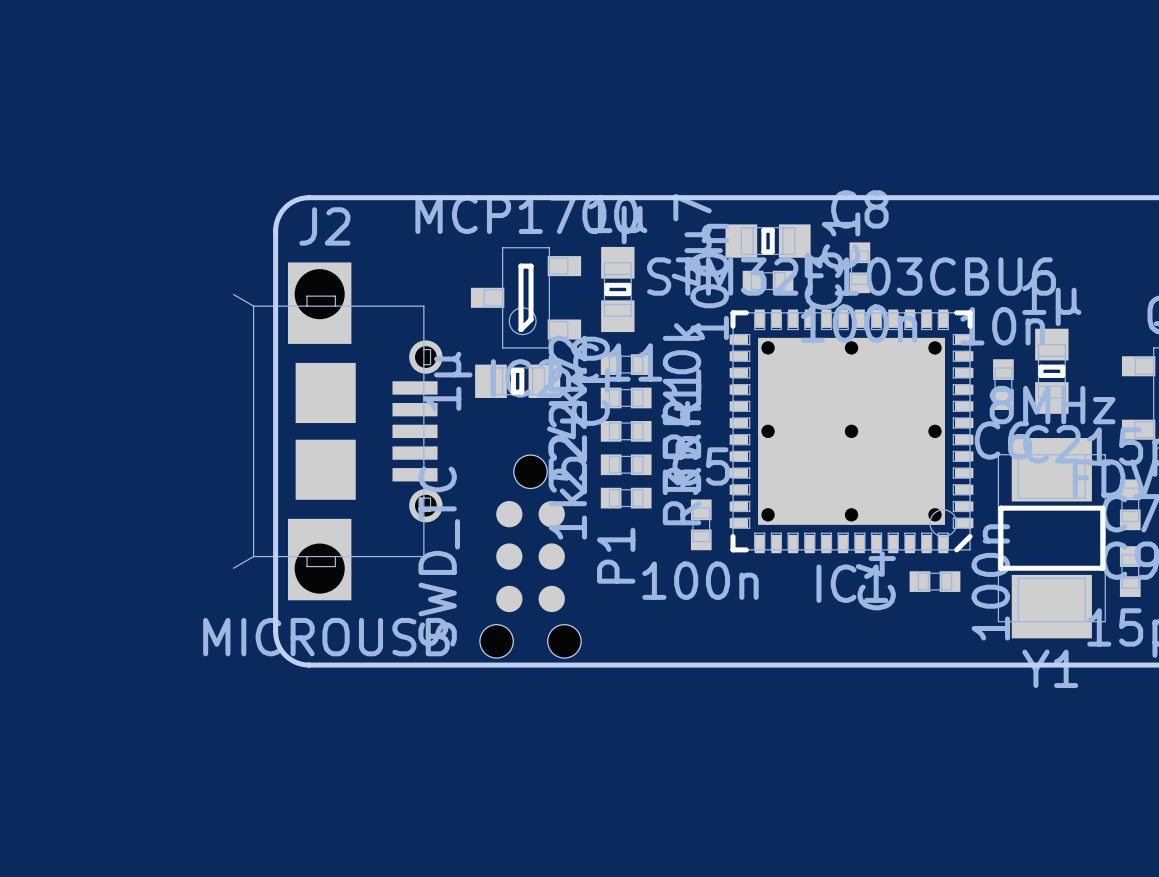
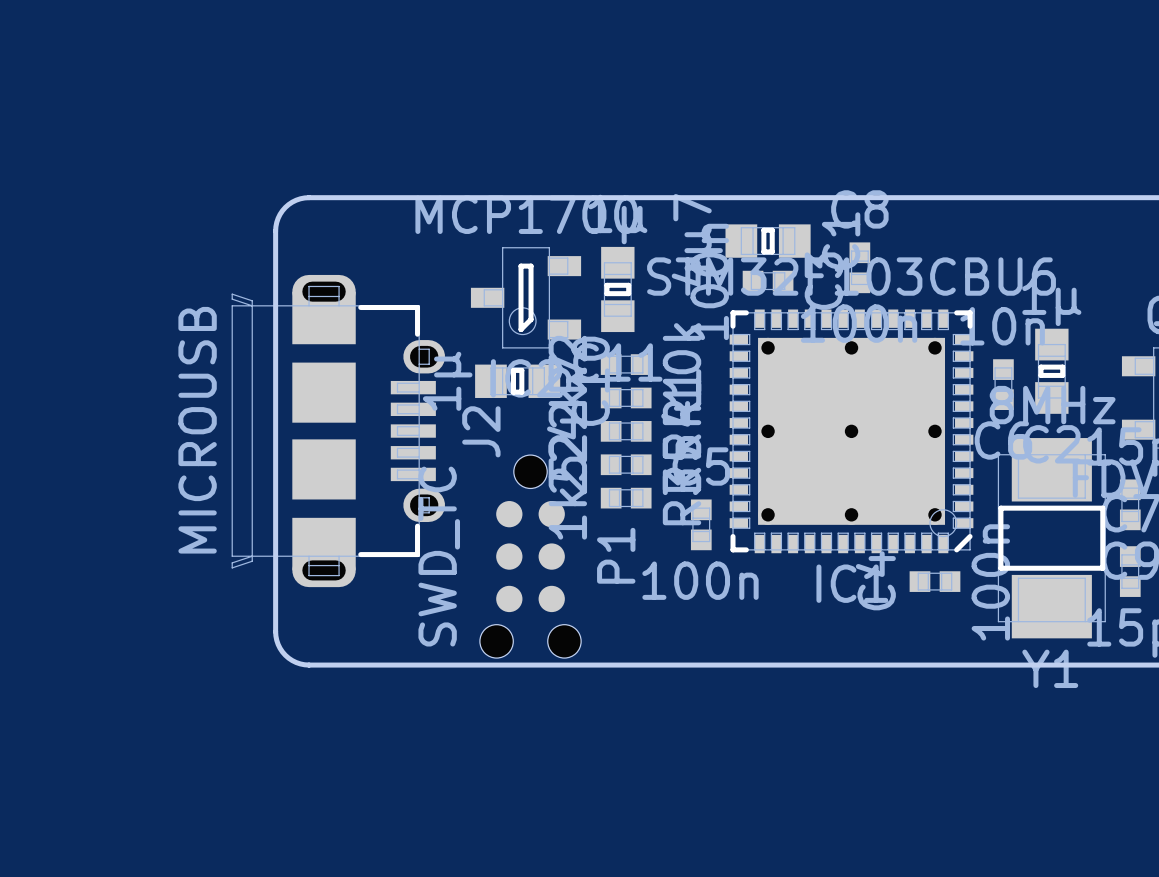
J2 name position: J2 (324, 226) -> J2 (481, 431)
J2 footprint: [233, 255, 443, 608] -> [232, 274, 446, 588]
J2 value position: MICROUSB (326, 637) -> MICROUSB (197, 430)

